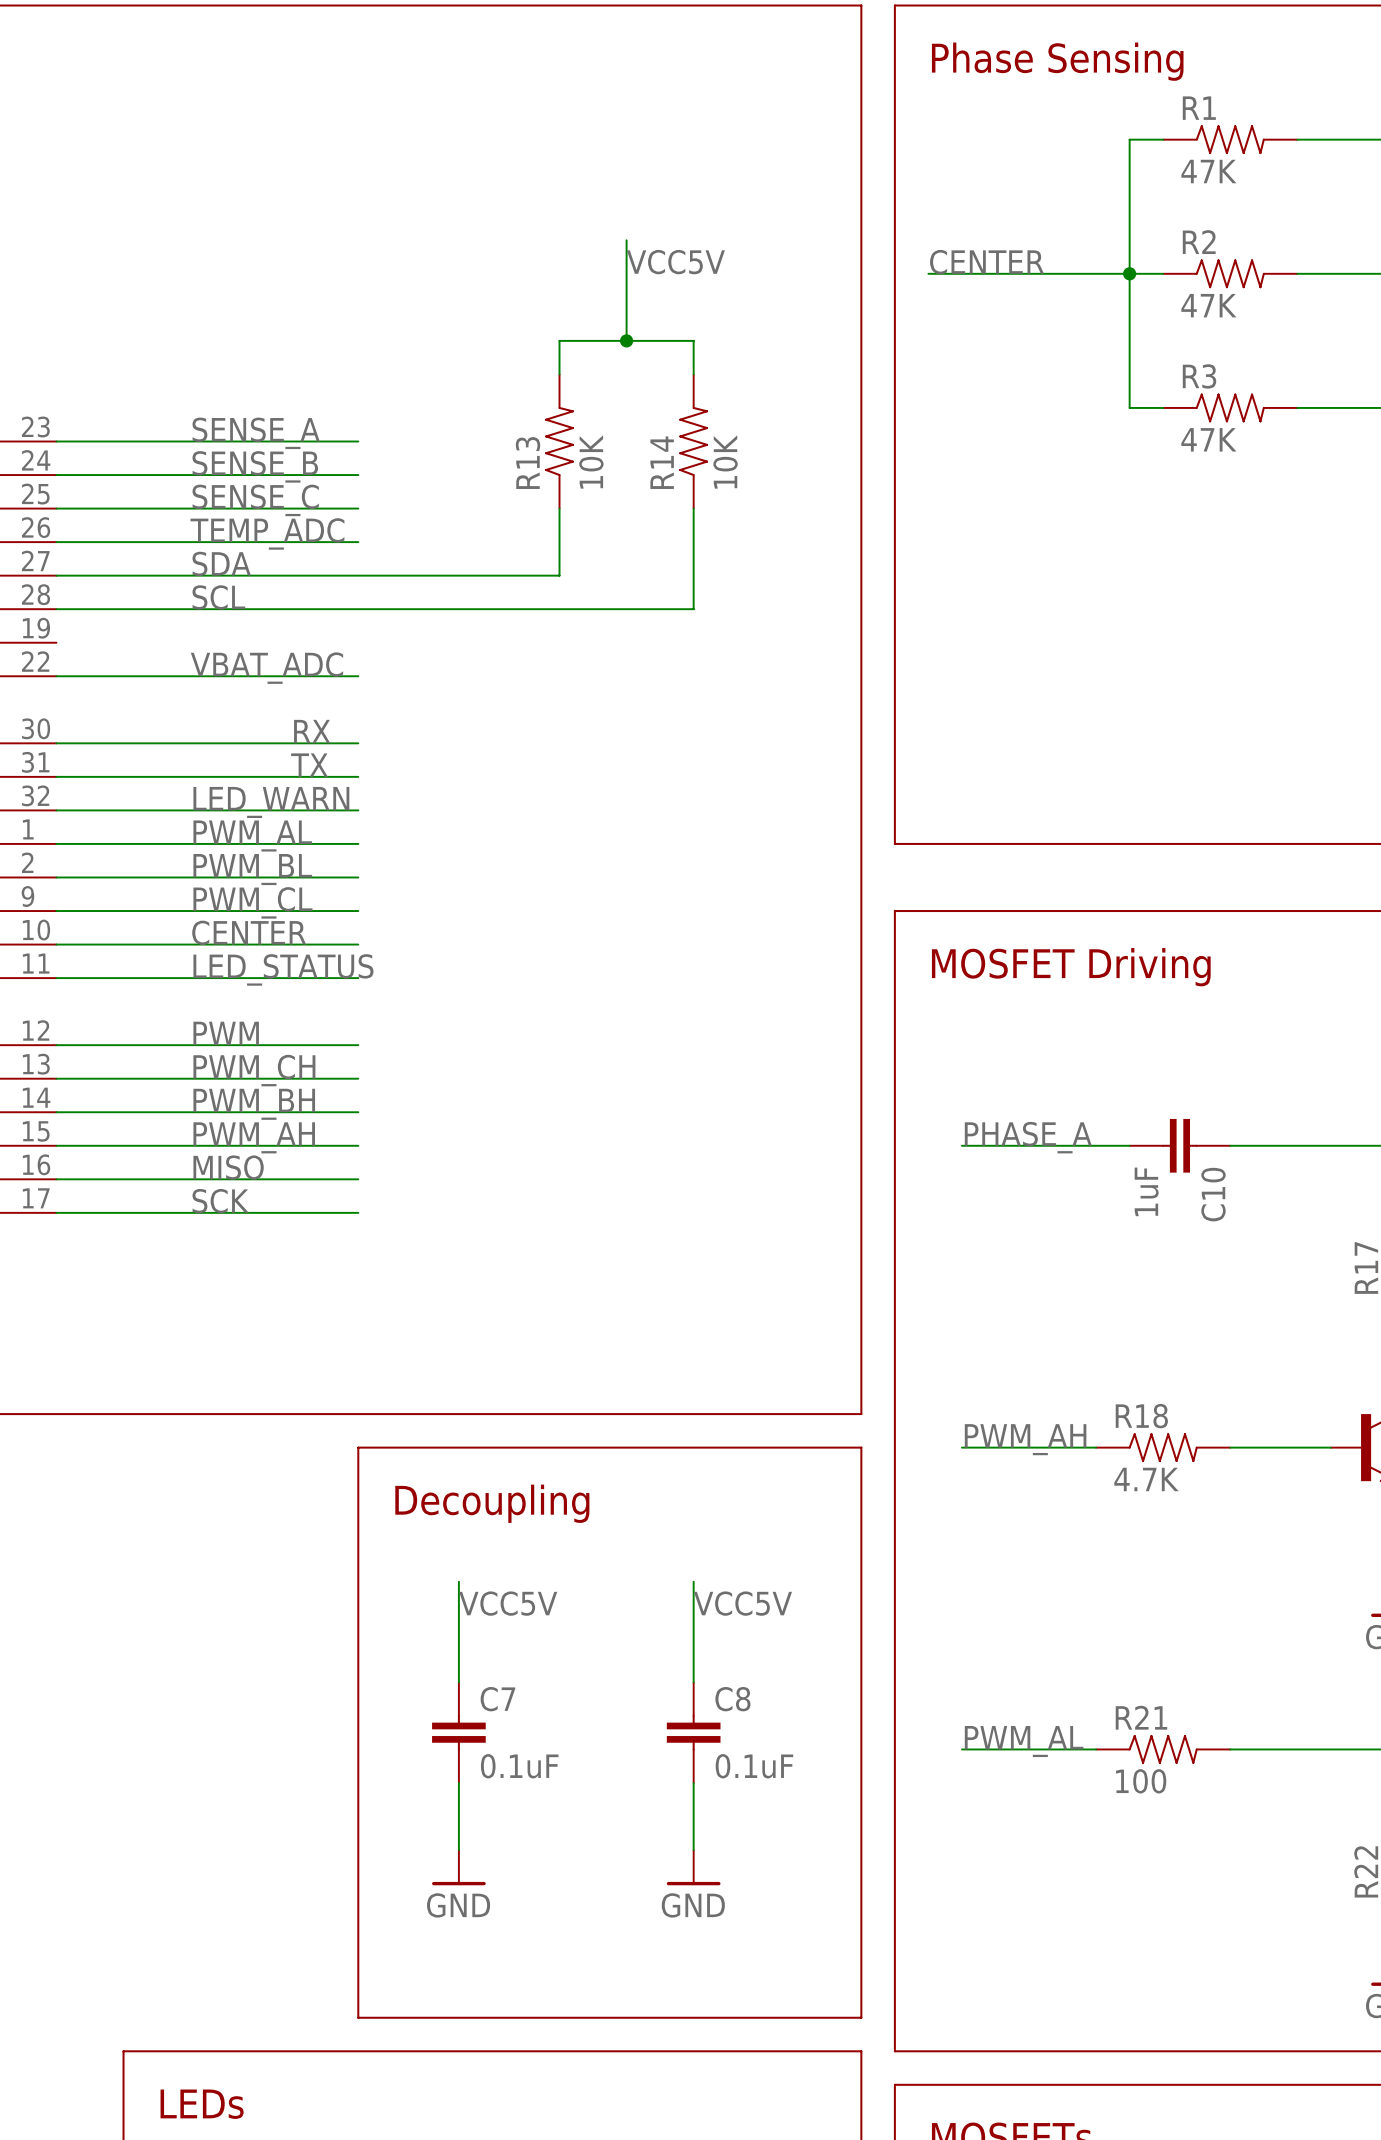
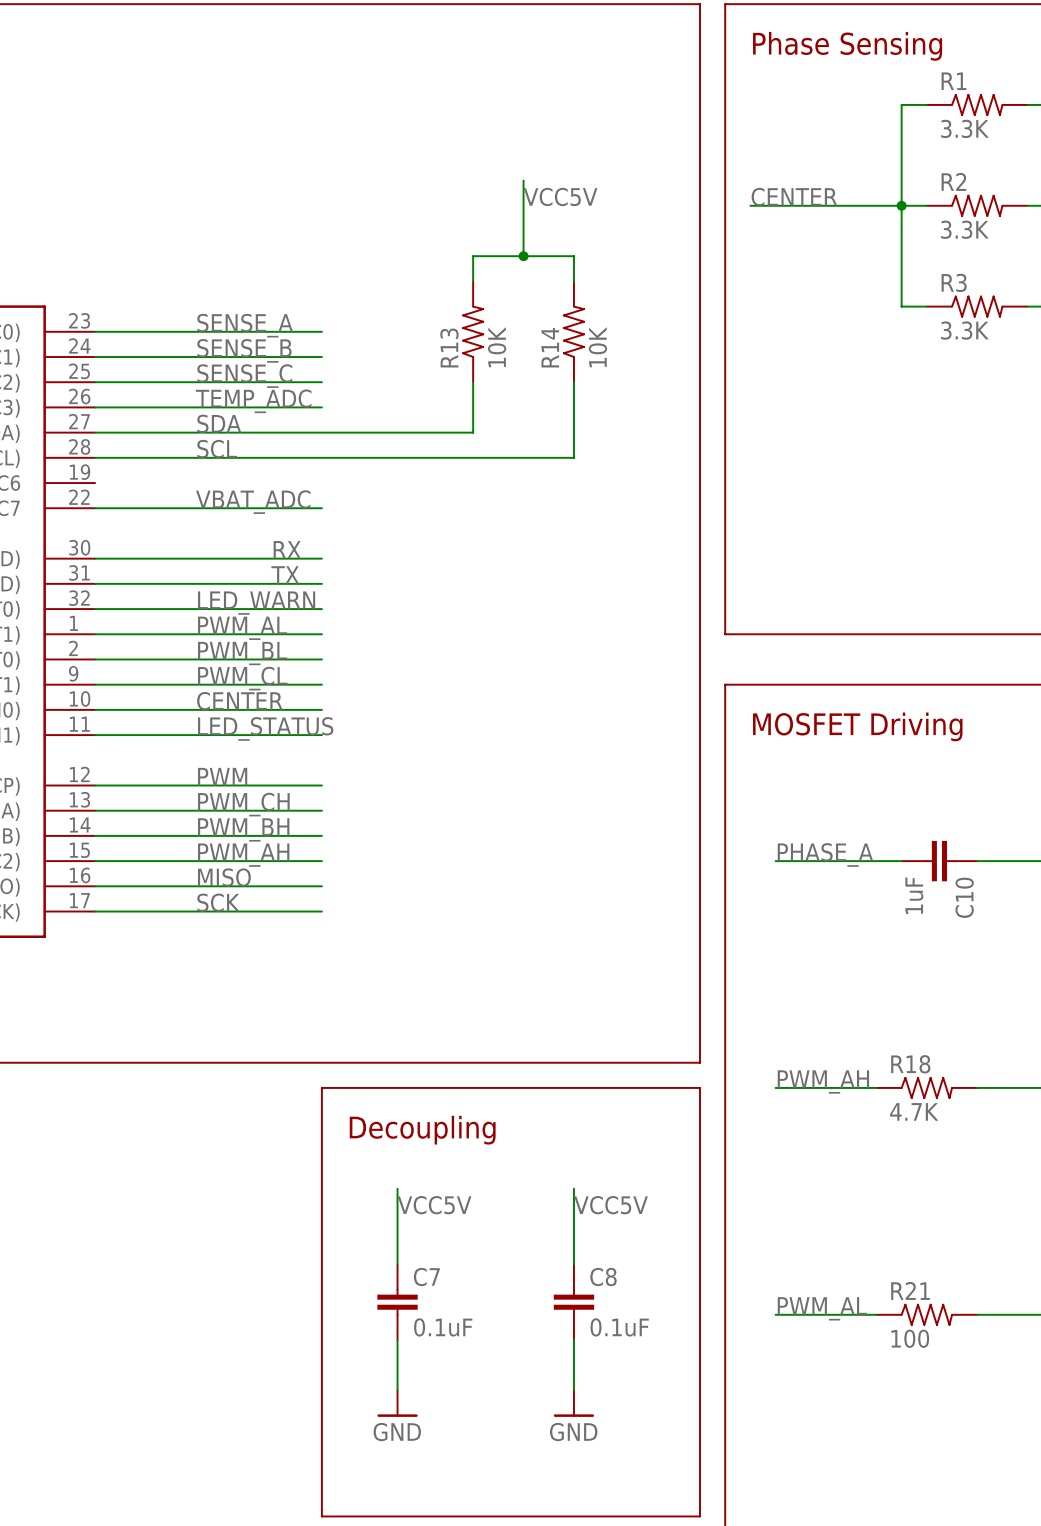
R1 value: 47K (1208, 171) -> 3.3K (964, 128)
R2 value: 47K (1208, 305) -> 3.3K (964, 229)
R3 value: 47K (1208, 439) -> 3.3K (964, 330)

